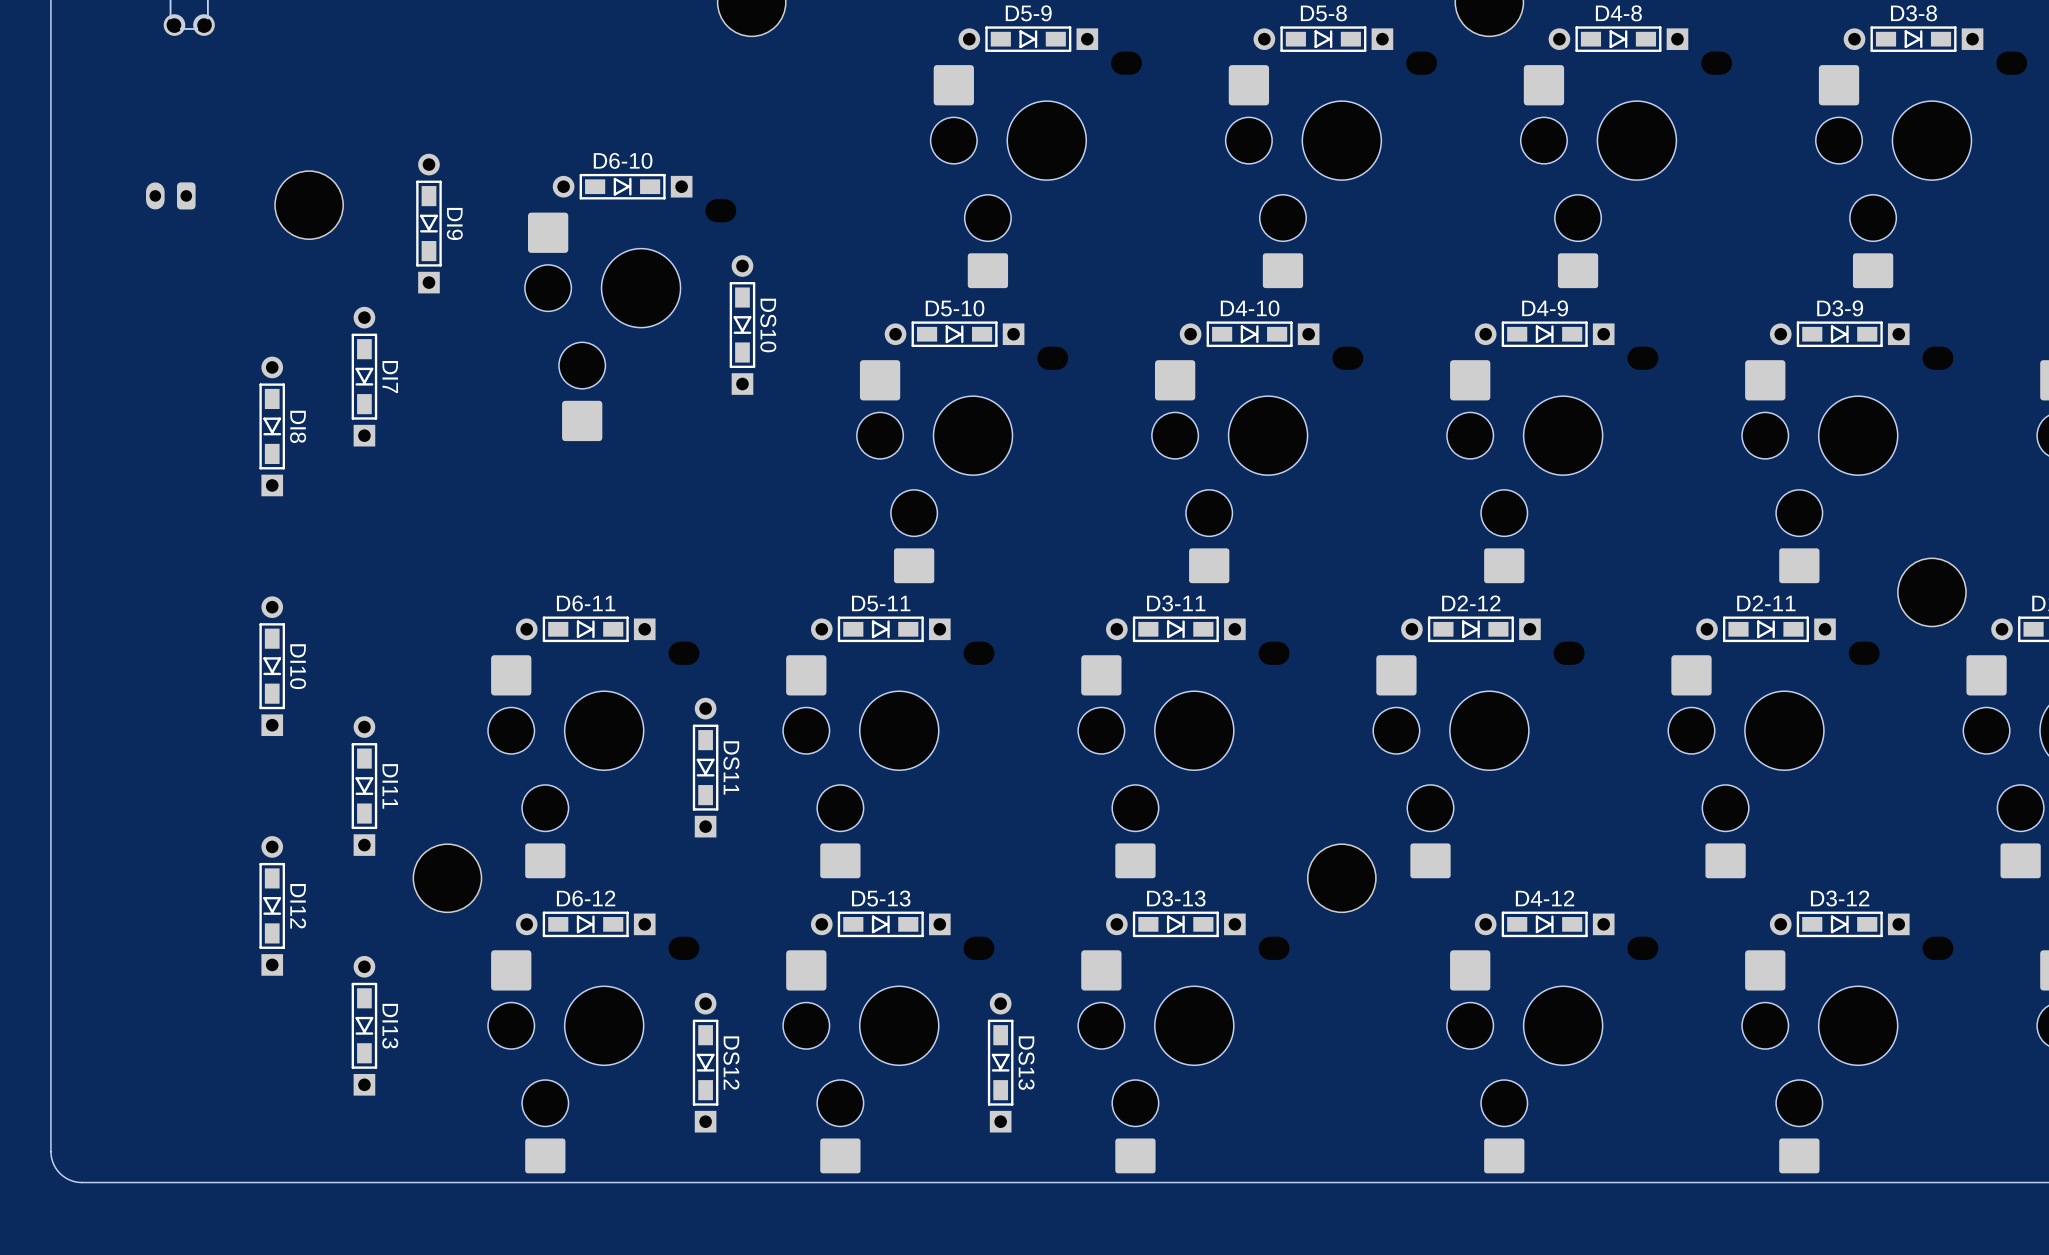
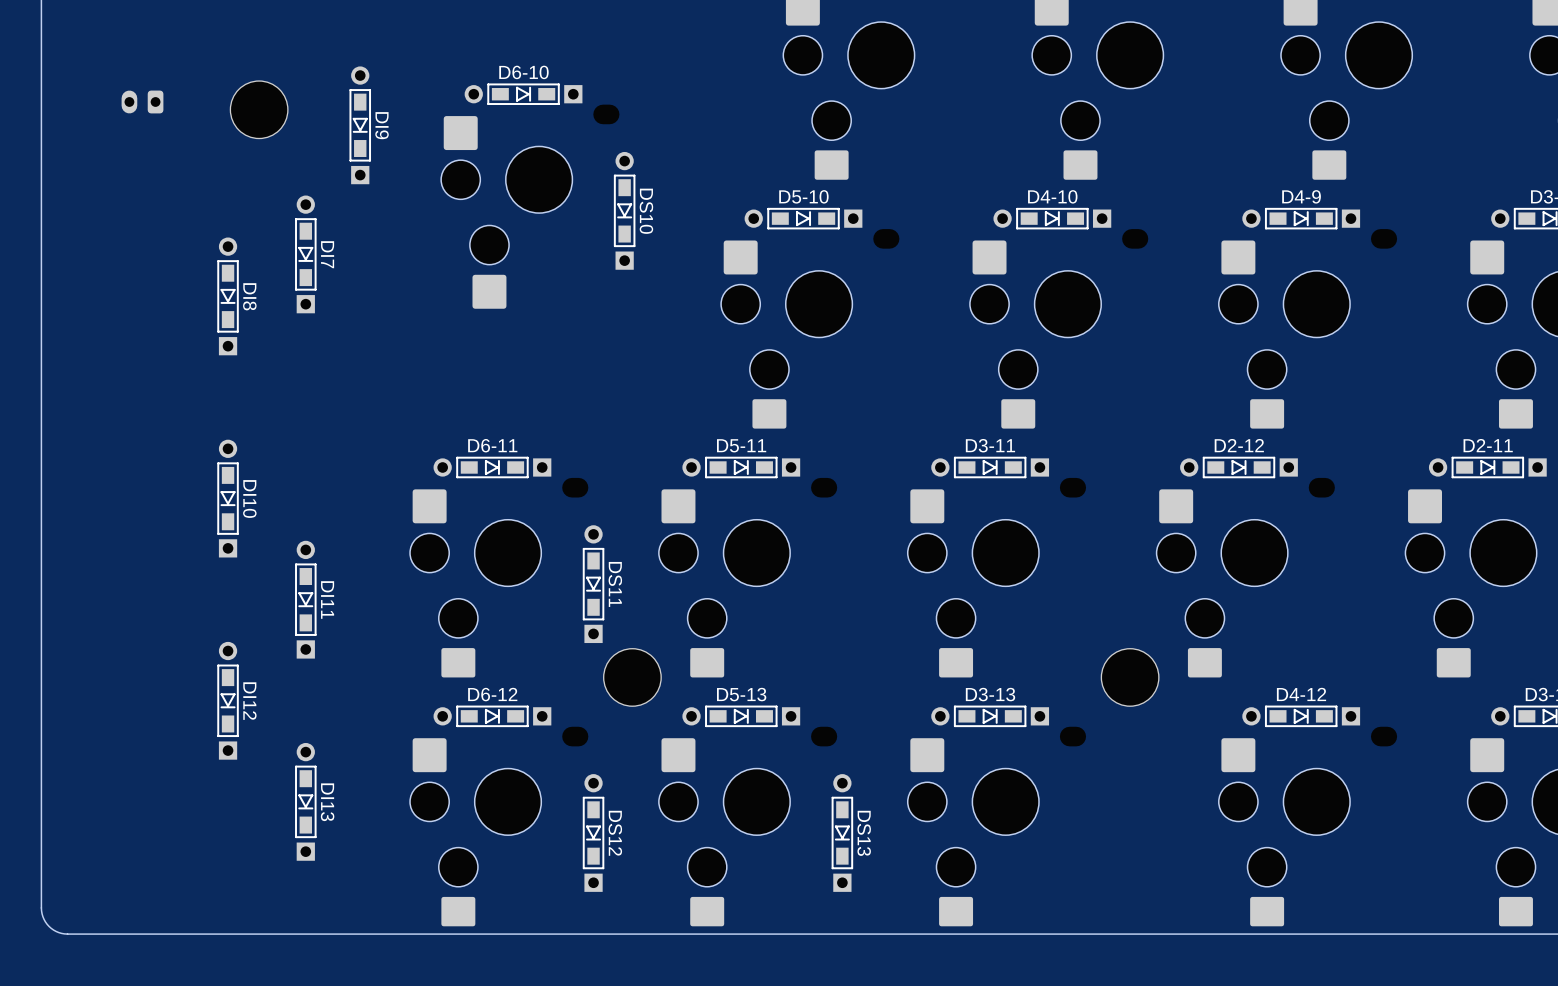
part position: (447, 878) -> (632, 677)

